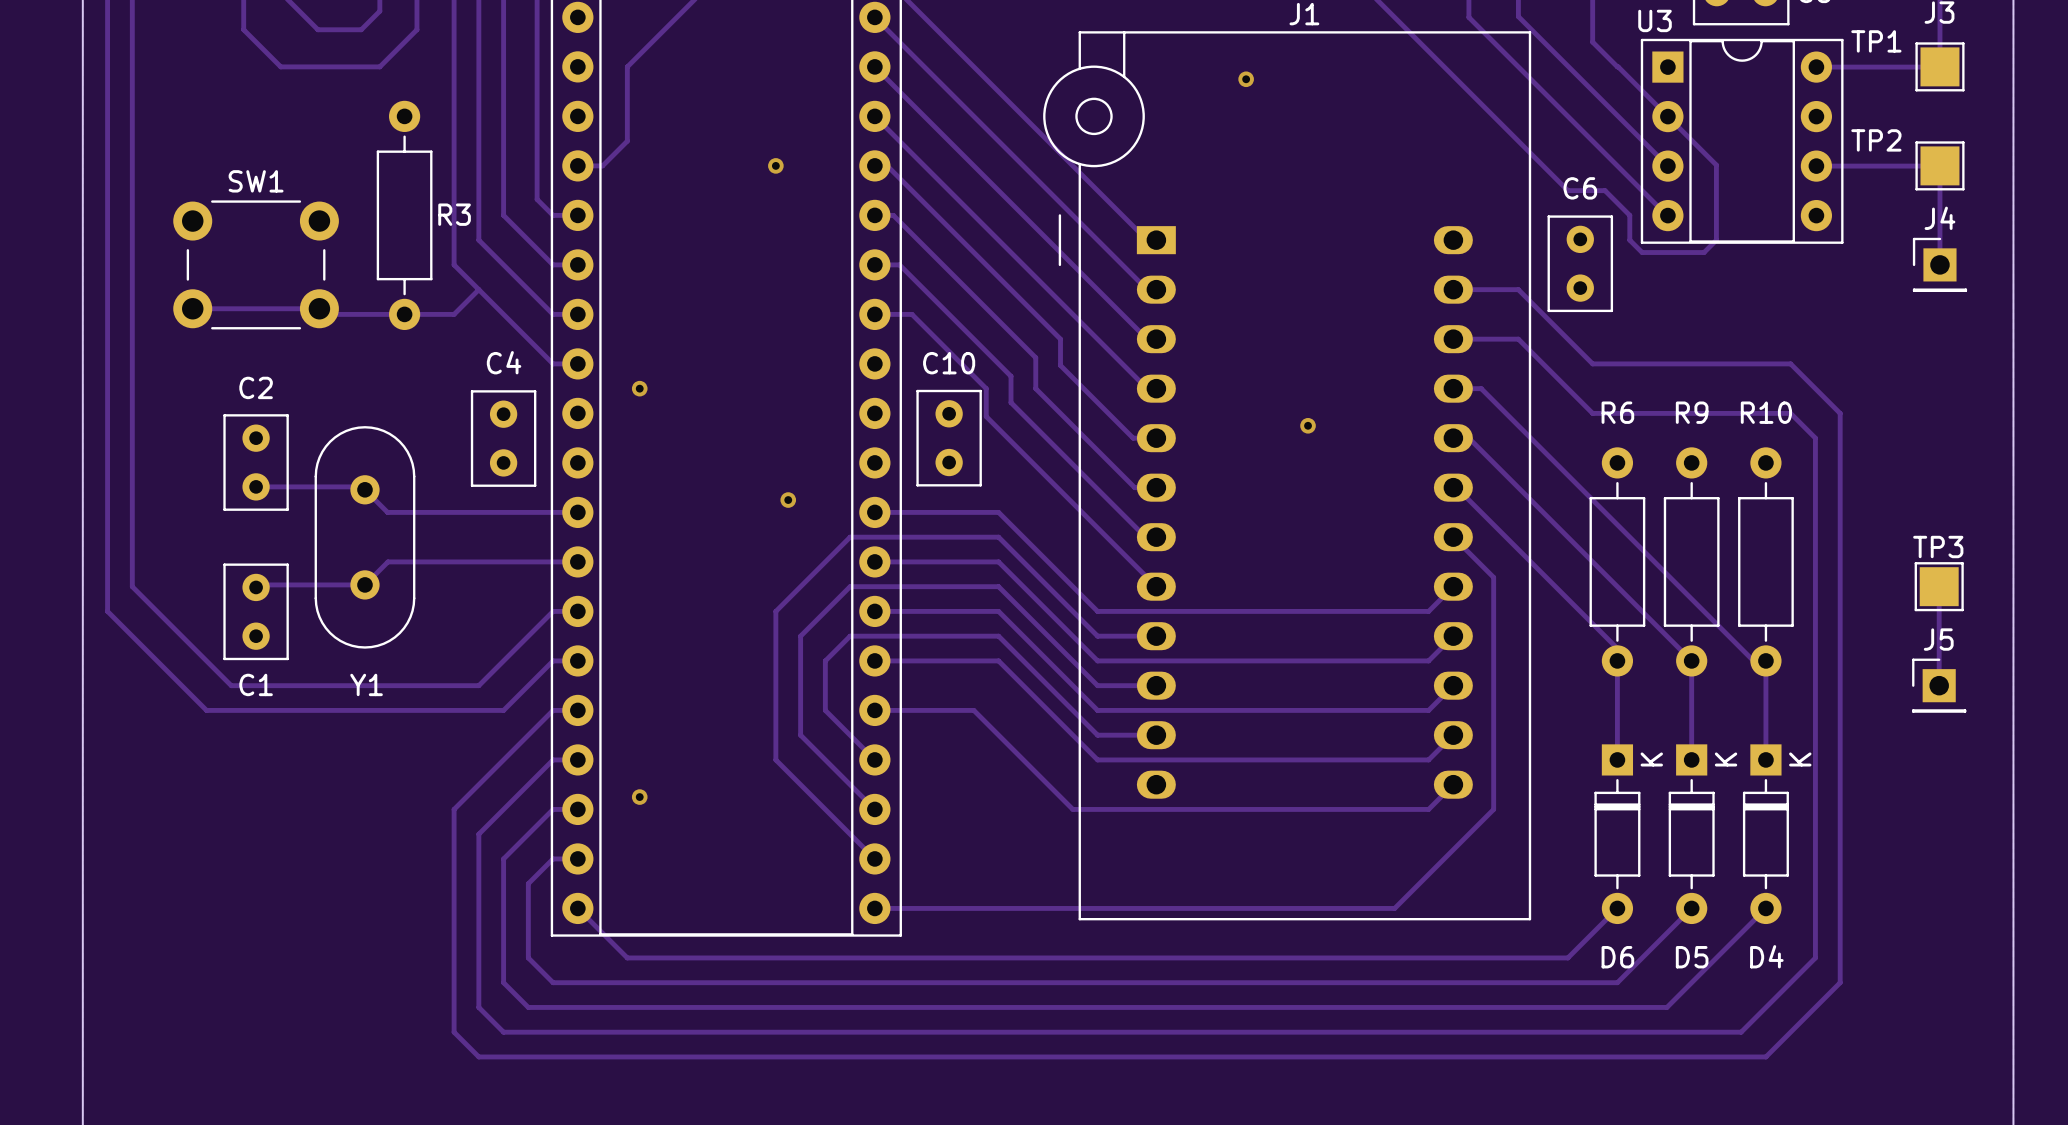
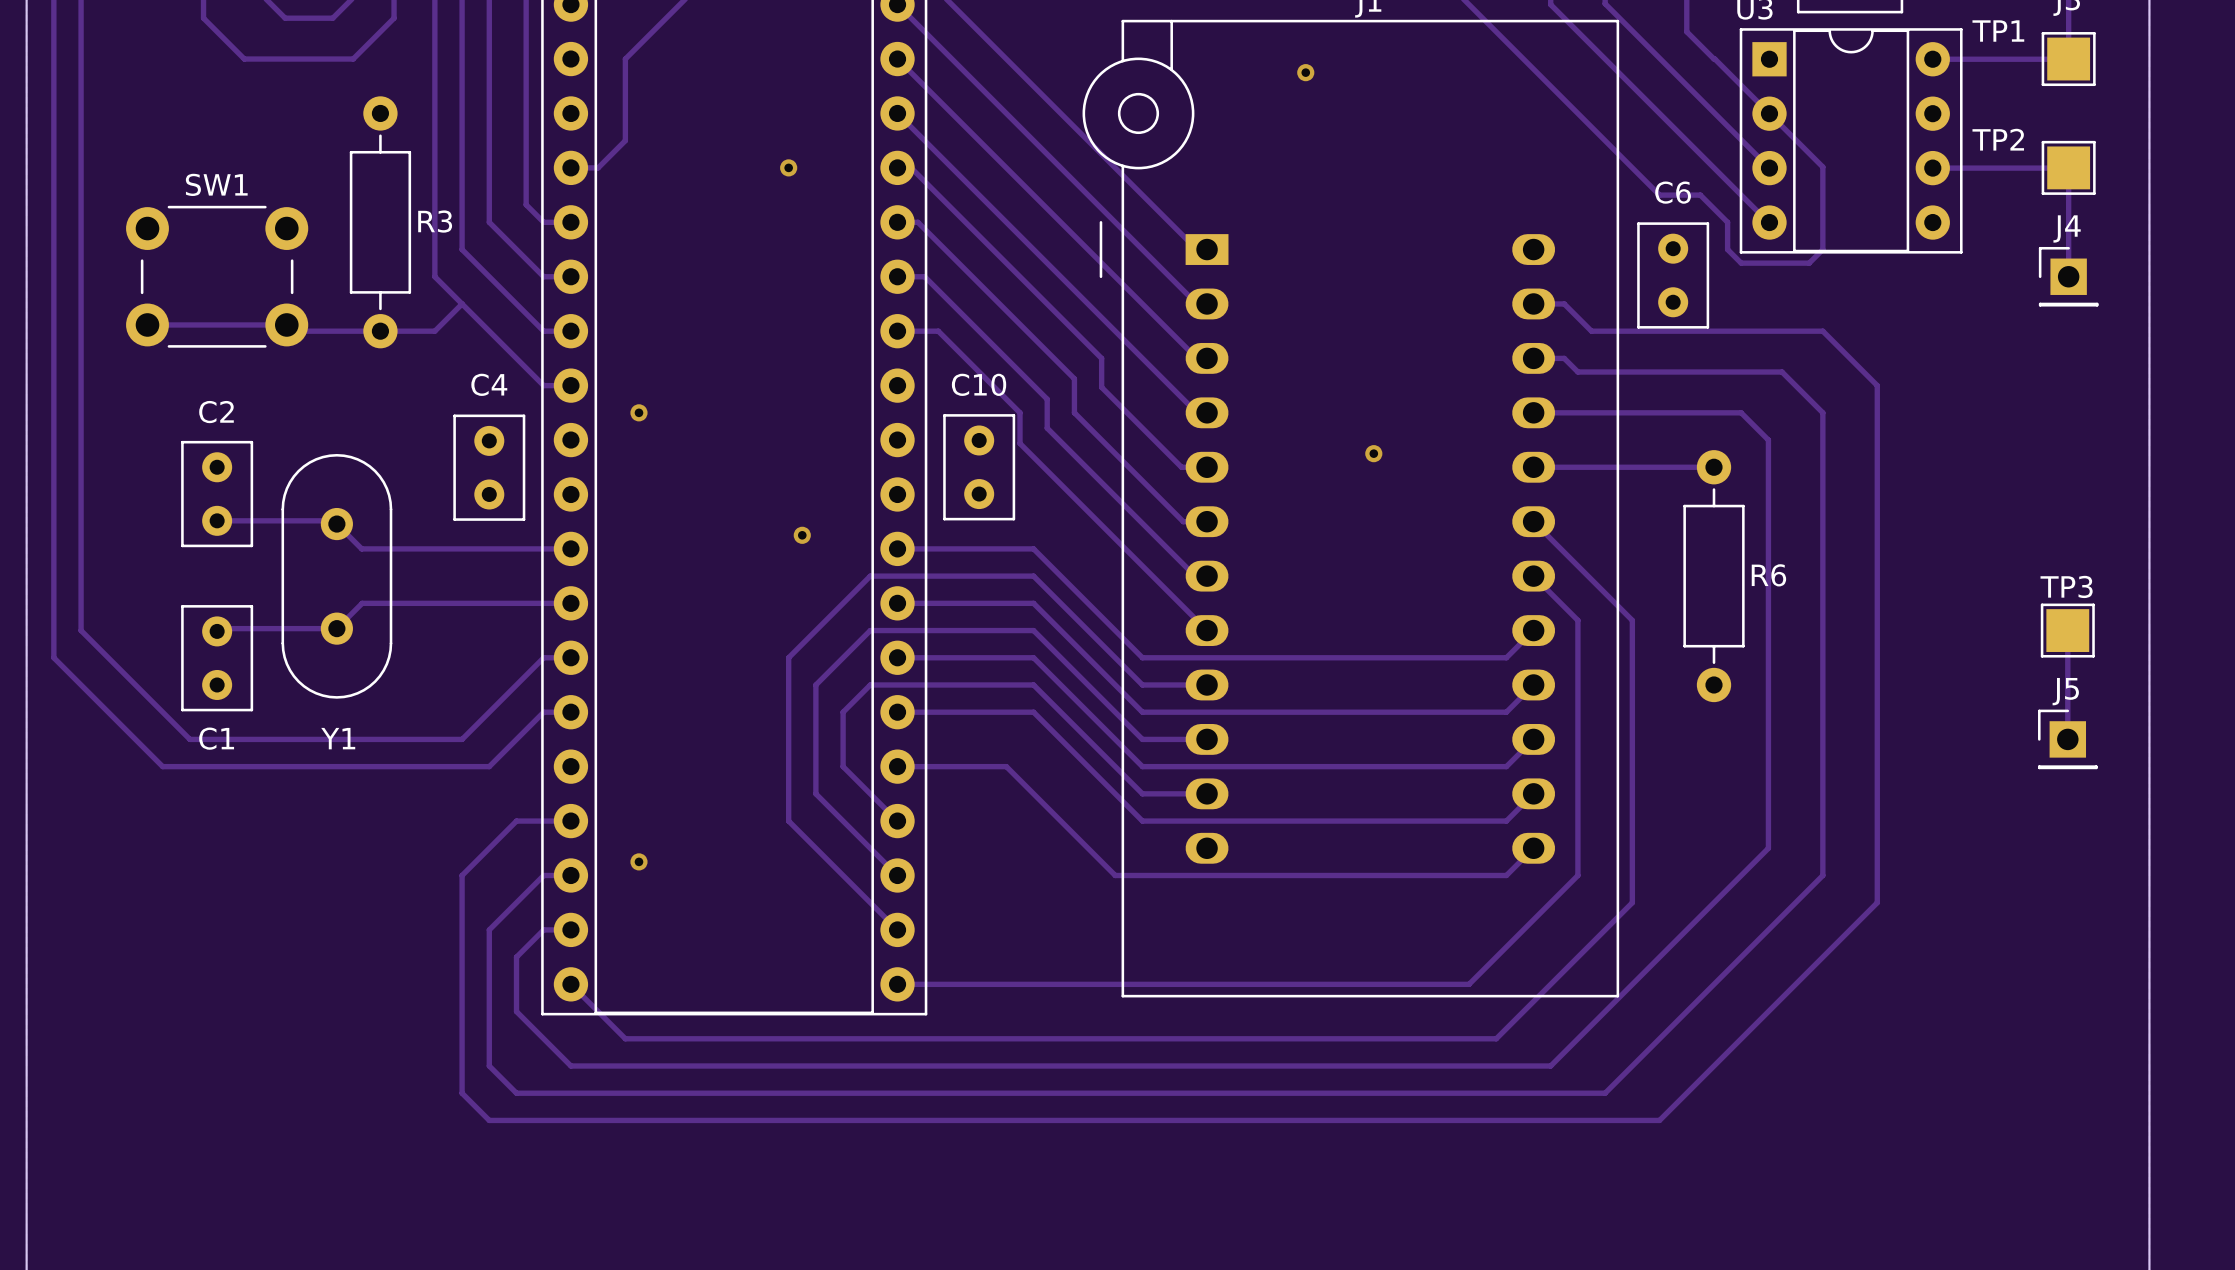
track: (1481, 289) (1518, 289) (1592, 363) (1790, 363) (1840, 413) (1840, 982) (1765, 1056) (478, 1056) (454, 1032) (454, 809) (553, 710) (577, 710) -> none
track: (1481, 339) (1518, 339) (1592, 413) (1790, 413) (1815, 438) (1815, 957) (1741, 1032) (1567, 1032) -> (1564, 358) (1577, 372) (1782, 372) (1822, 412) (1822, 875) (1713, 984)
track: (1481, 388) (1753, 660) (1765, 660) -> (1564, 303) (1591, 331) (1822, 331) (1877, 385) (1877, 712)
track: none -> (1564, 412) (1741, 412) (1768, 440) (1768, 848) (1550, 1066)
R6 name position: R6 (1617, 412) -> R6 (1768, 575)
track: (1468, 438) (1691, 660) (1691, 759) -> (1550, 467) (1713, 467)
track: (1453, 487) (1456, 487) (1617, 648) (1617, 759) -> (1533, 521) (1632, 620) (1632, 902) (1496, 1038)
R6 position: (1617, 561) -> (1713, 576)
R9: (1691, 561) -> none
R10: (1765, 561) -> none
track: (553, 759) (478, 834) -> (543, 821) (516, 821) (462, 875) (462, 902)
track: none -> (1877, 821) (1877, 902) (1795, 984)
D6: (1617, 834) -> none
D5: (1691, 834) -> none
D4: (1765, 834) -> none
track: (1765, 908) (1666, 1007) (1518, 1007) -> none
track: (528, 933) (528, 957) (553, 982) (577, 982) -> (516, 1011) (570, 1066)
track: (1419, 957) (1567, 957) -> (1605, 1093) (1659, 1038)
track: (1468, 982) (1617, 982) -> (1659, 1120) (1713, 1066)

